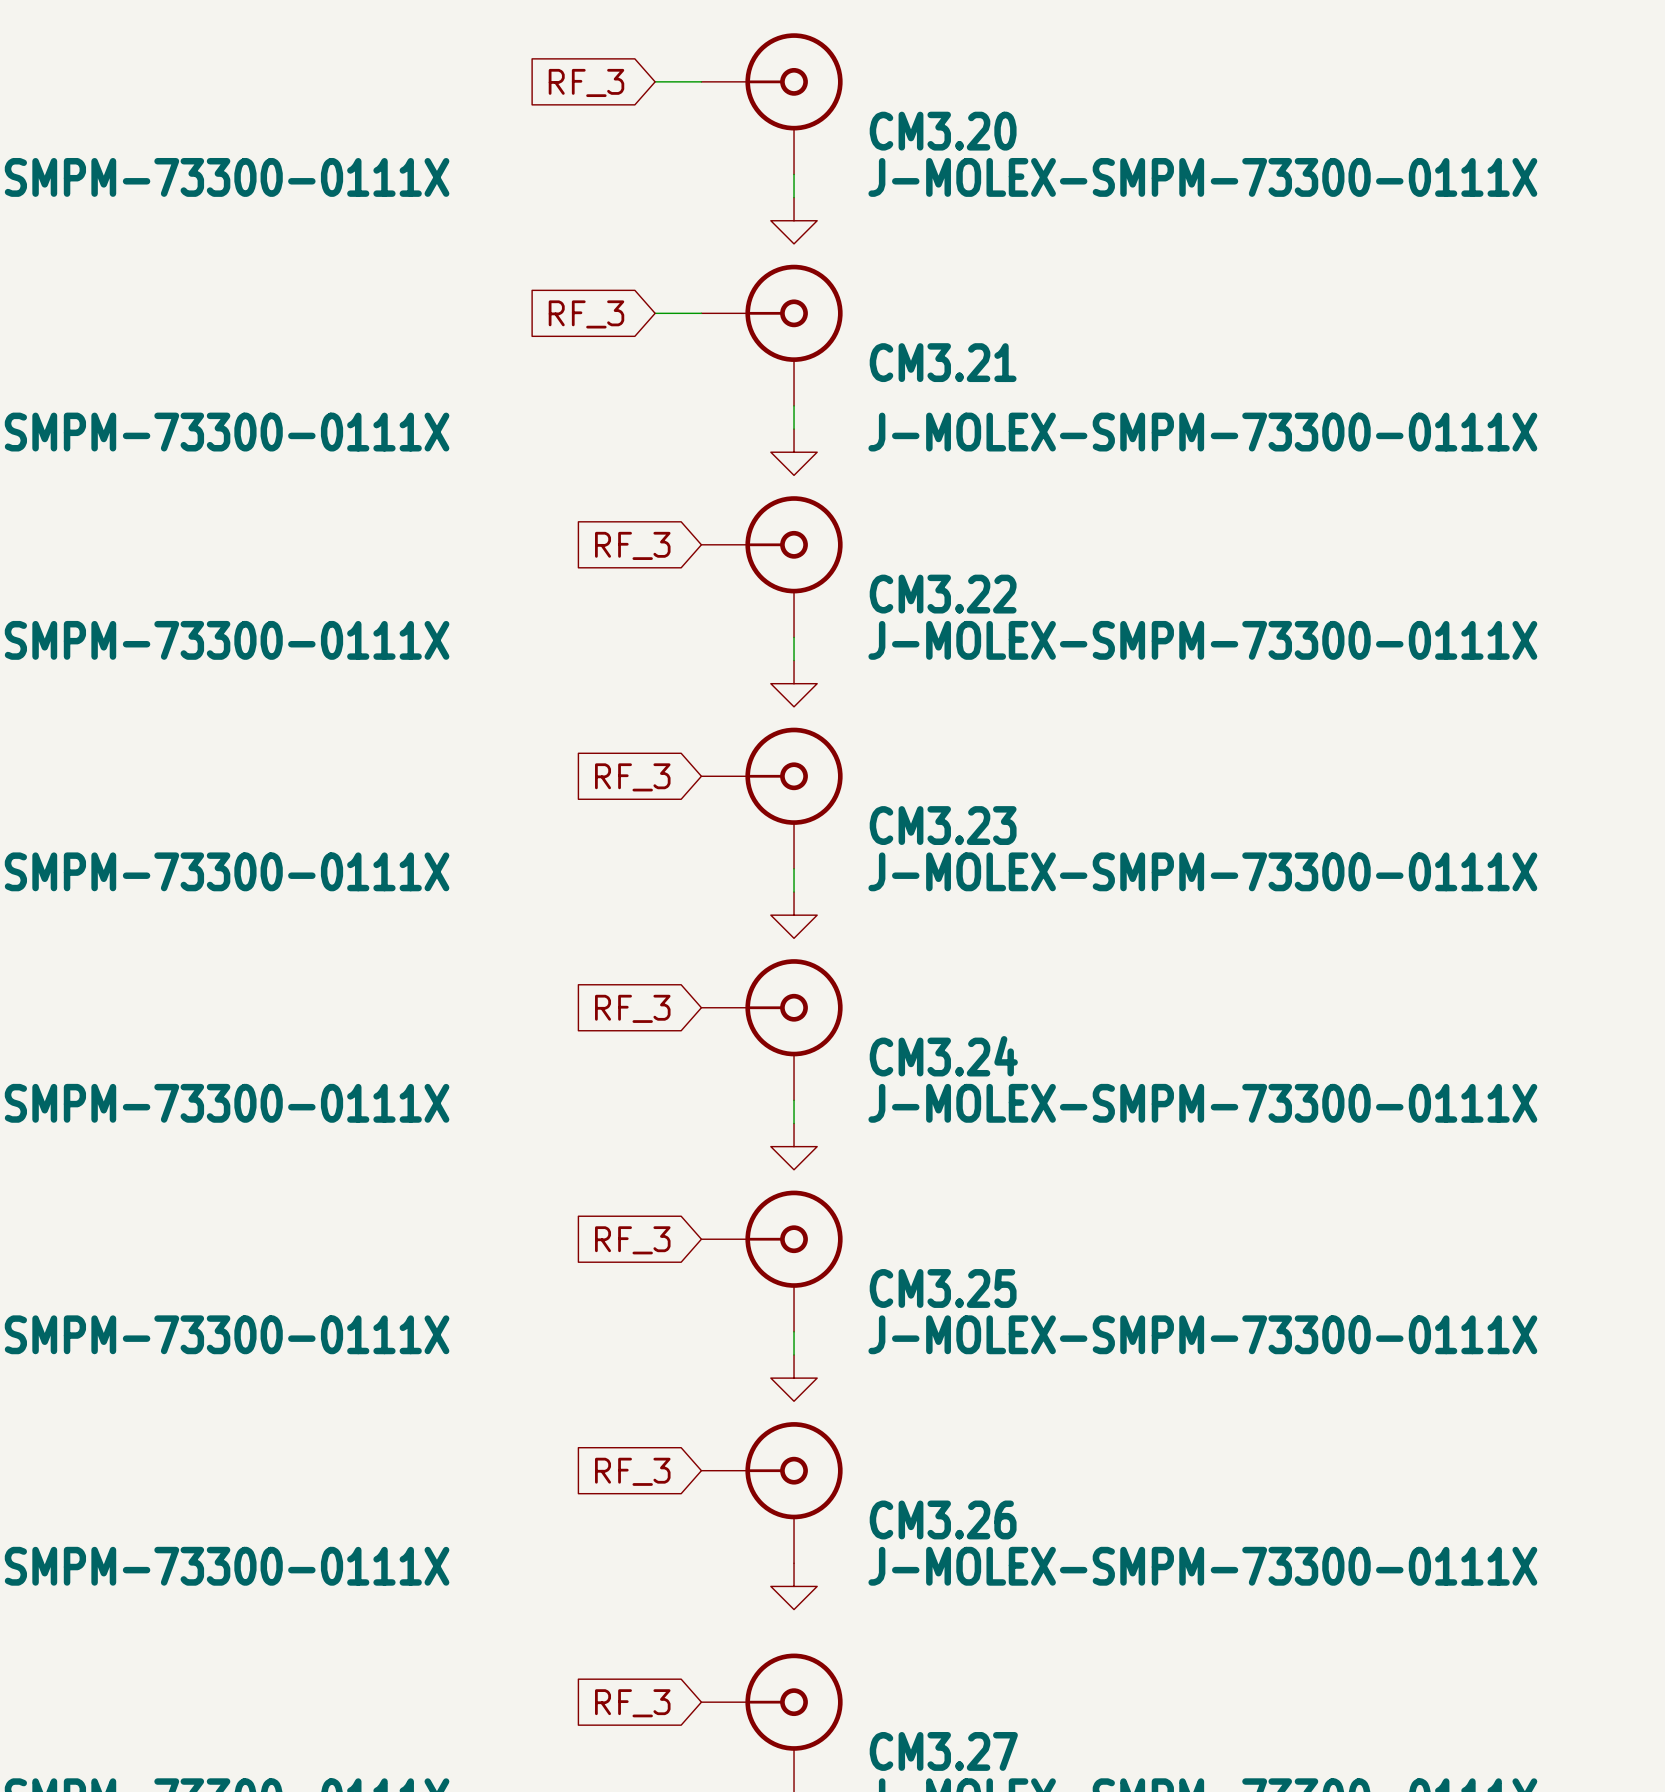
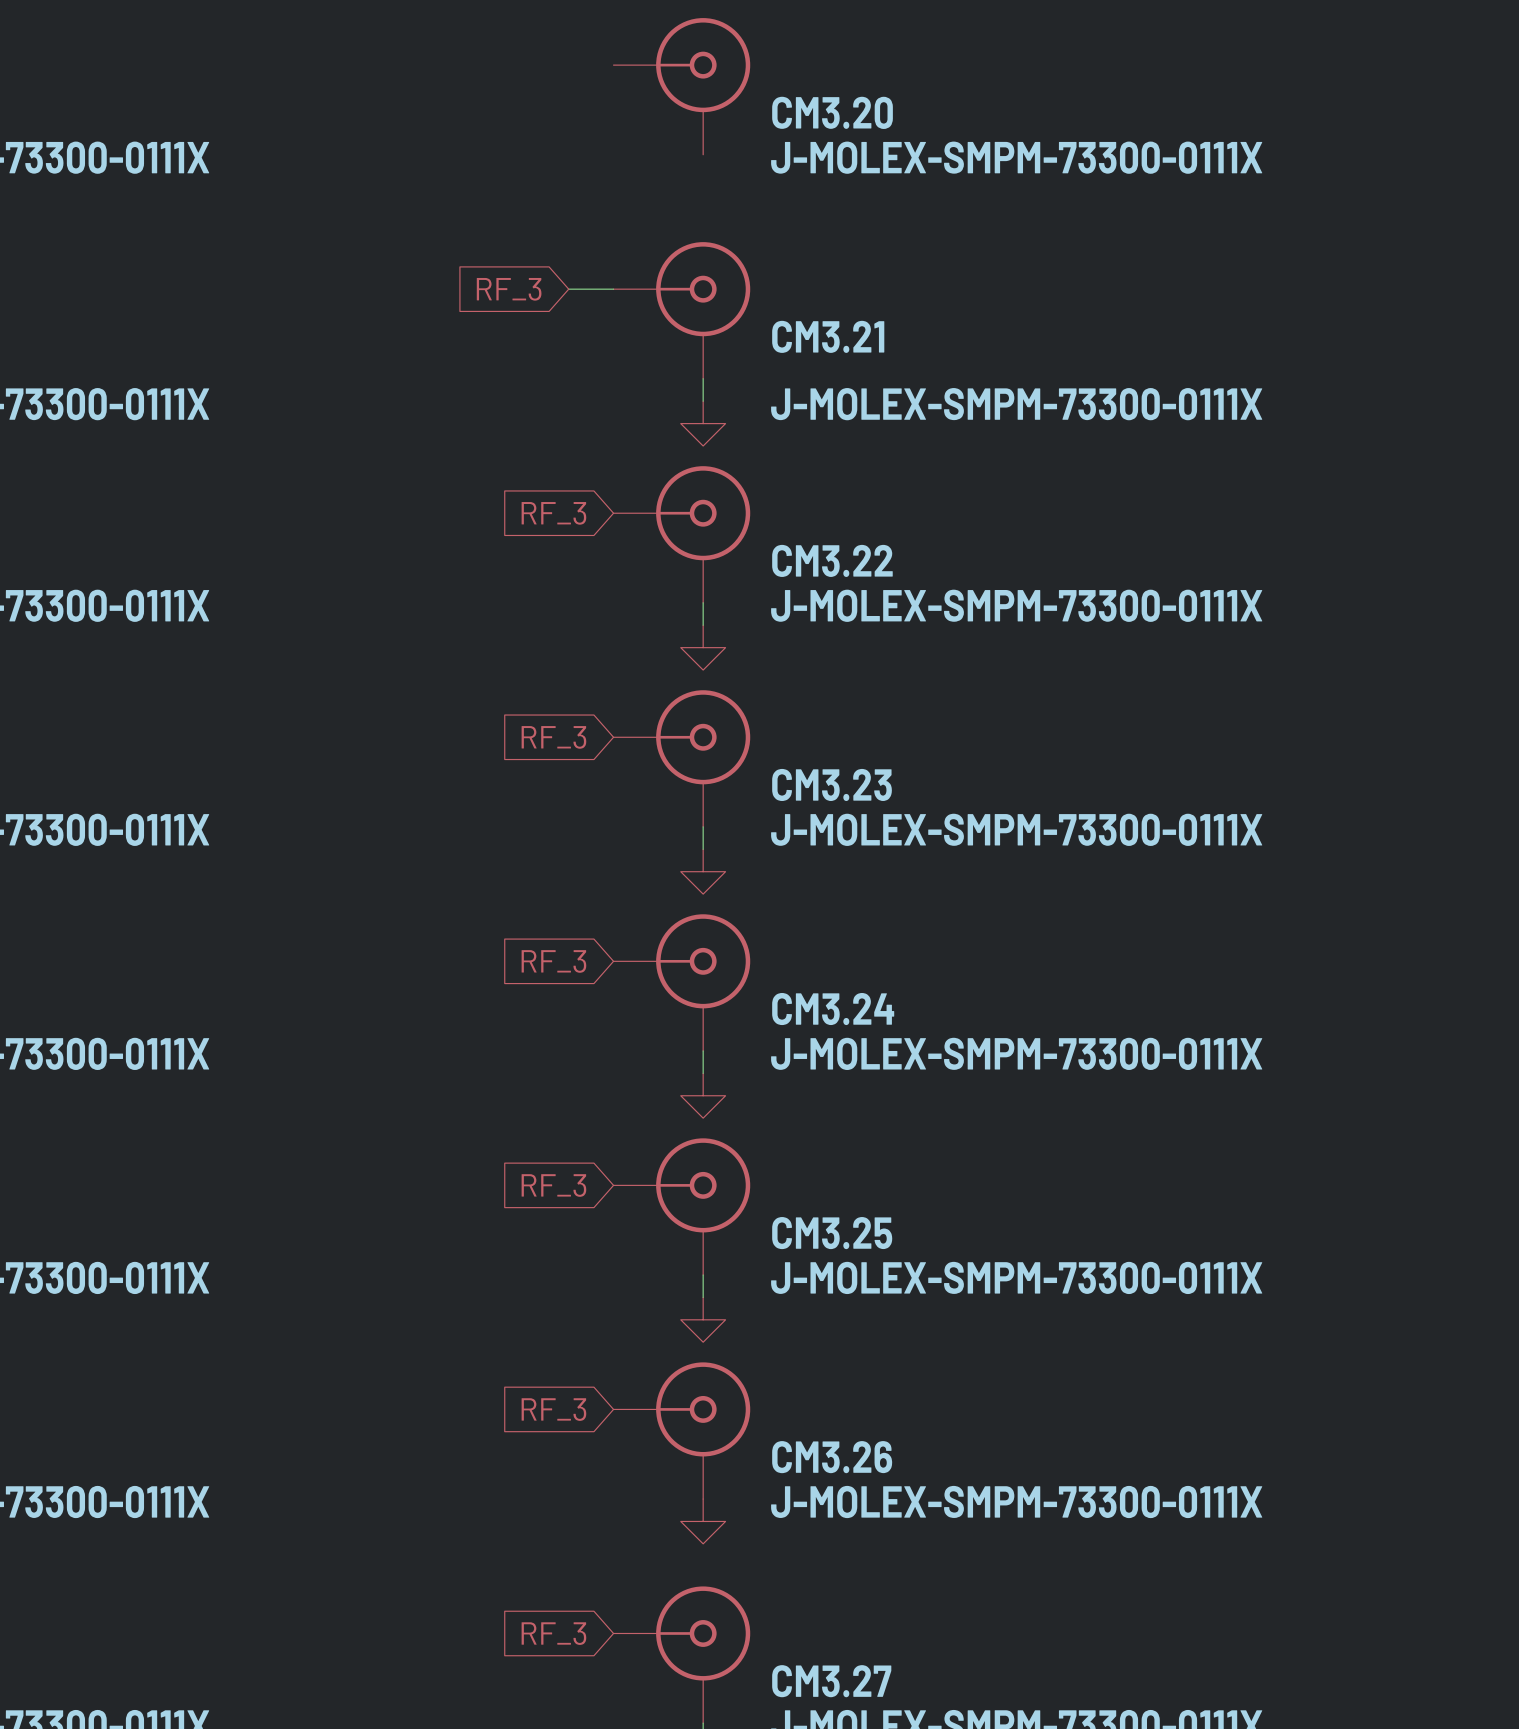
wire: (655, 81) (701, 81) -> none
global label: RF_3 (586, 82) -> none
wire: (794, 174) (794, 197) -> none
power symbol: (794, 220) -> none

